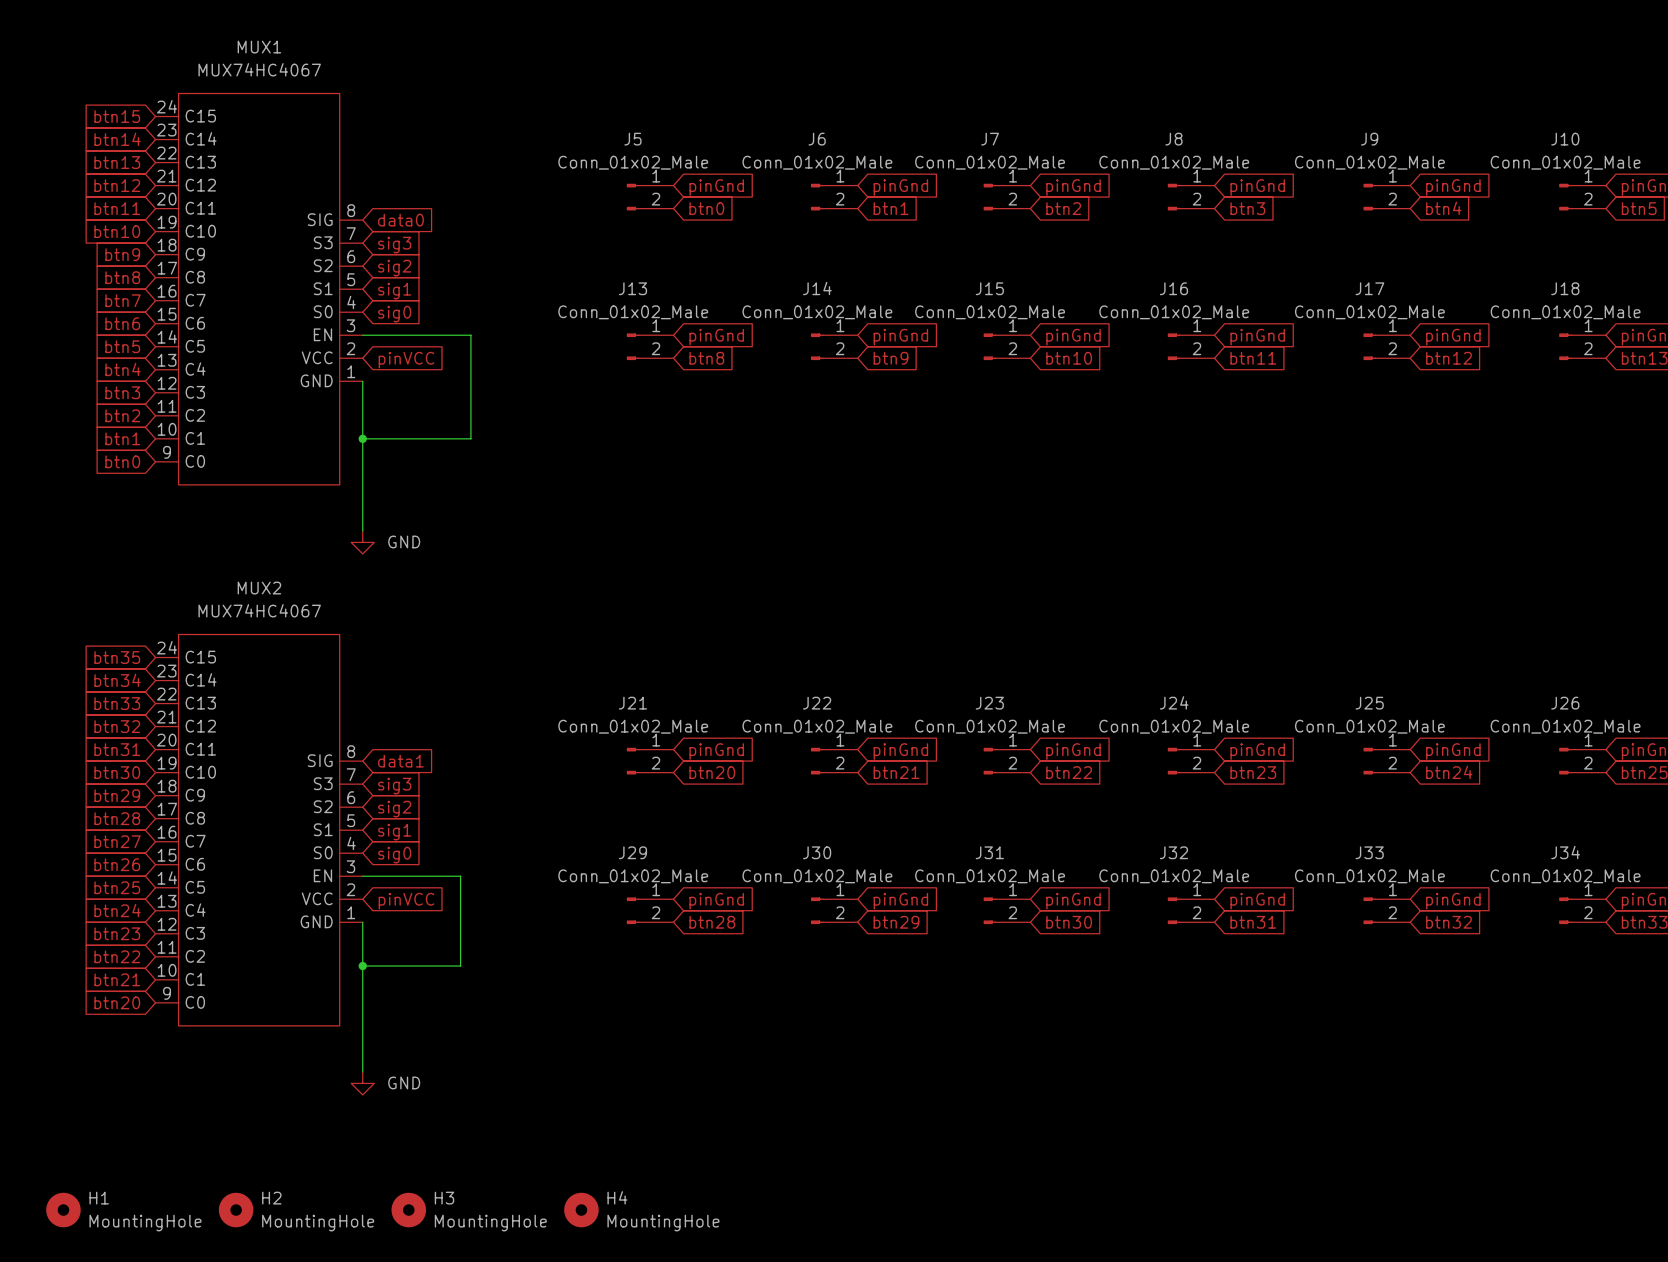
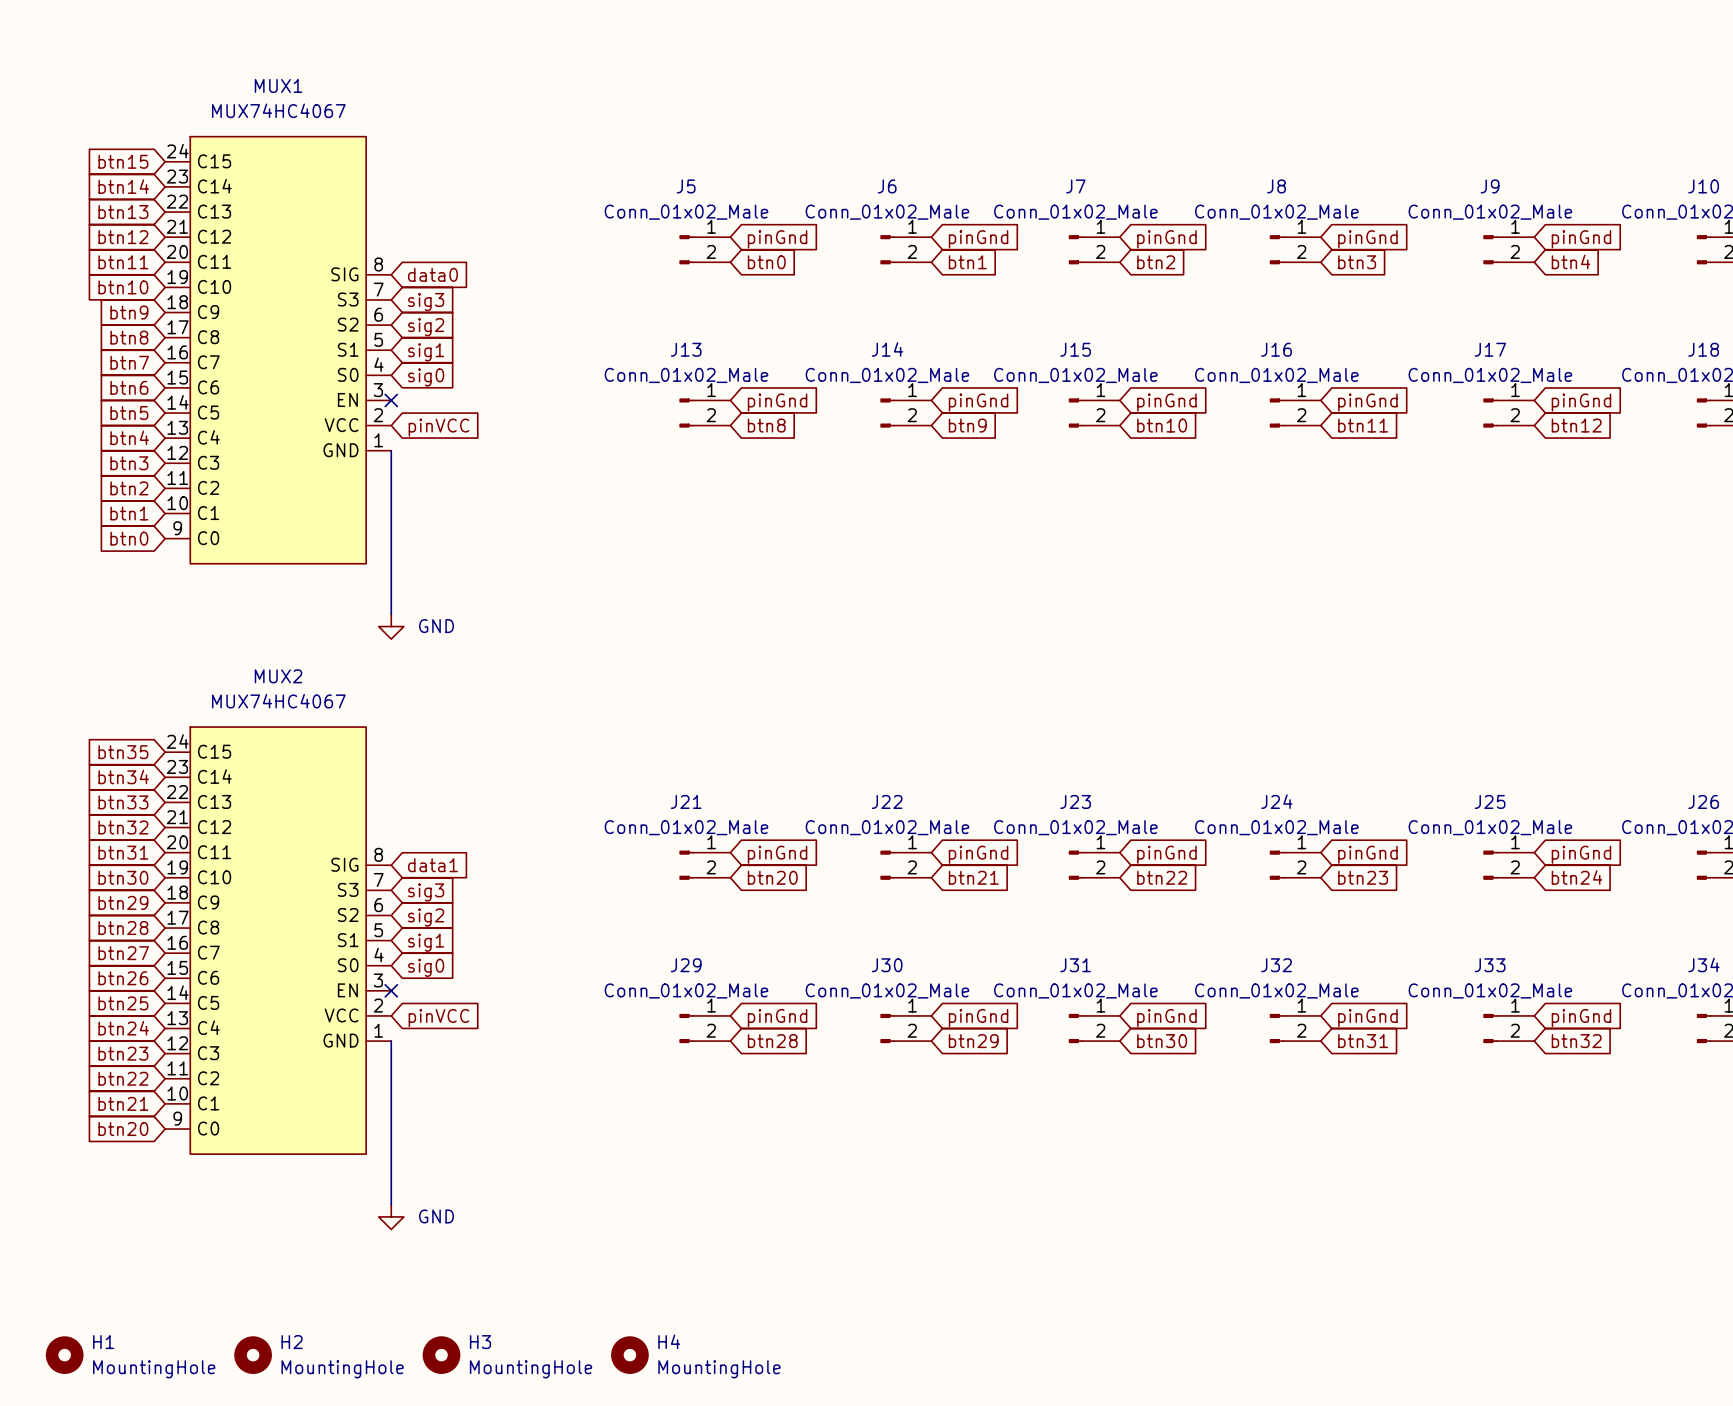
wire: (362, 335) (470, 335) (470, 438) (362, 438) -> none
no-connect mark: none -> (391, 400)
junction: (362, 438) -> none
wire: (362, 876) (460, 876) (460, 966) (362, 966) -> none
no-connect mark: none -> (391, 990)
junction: (362, 966) -> none

